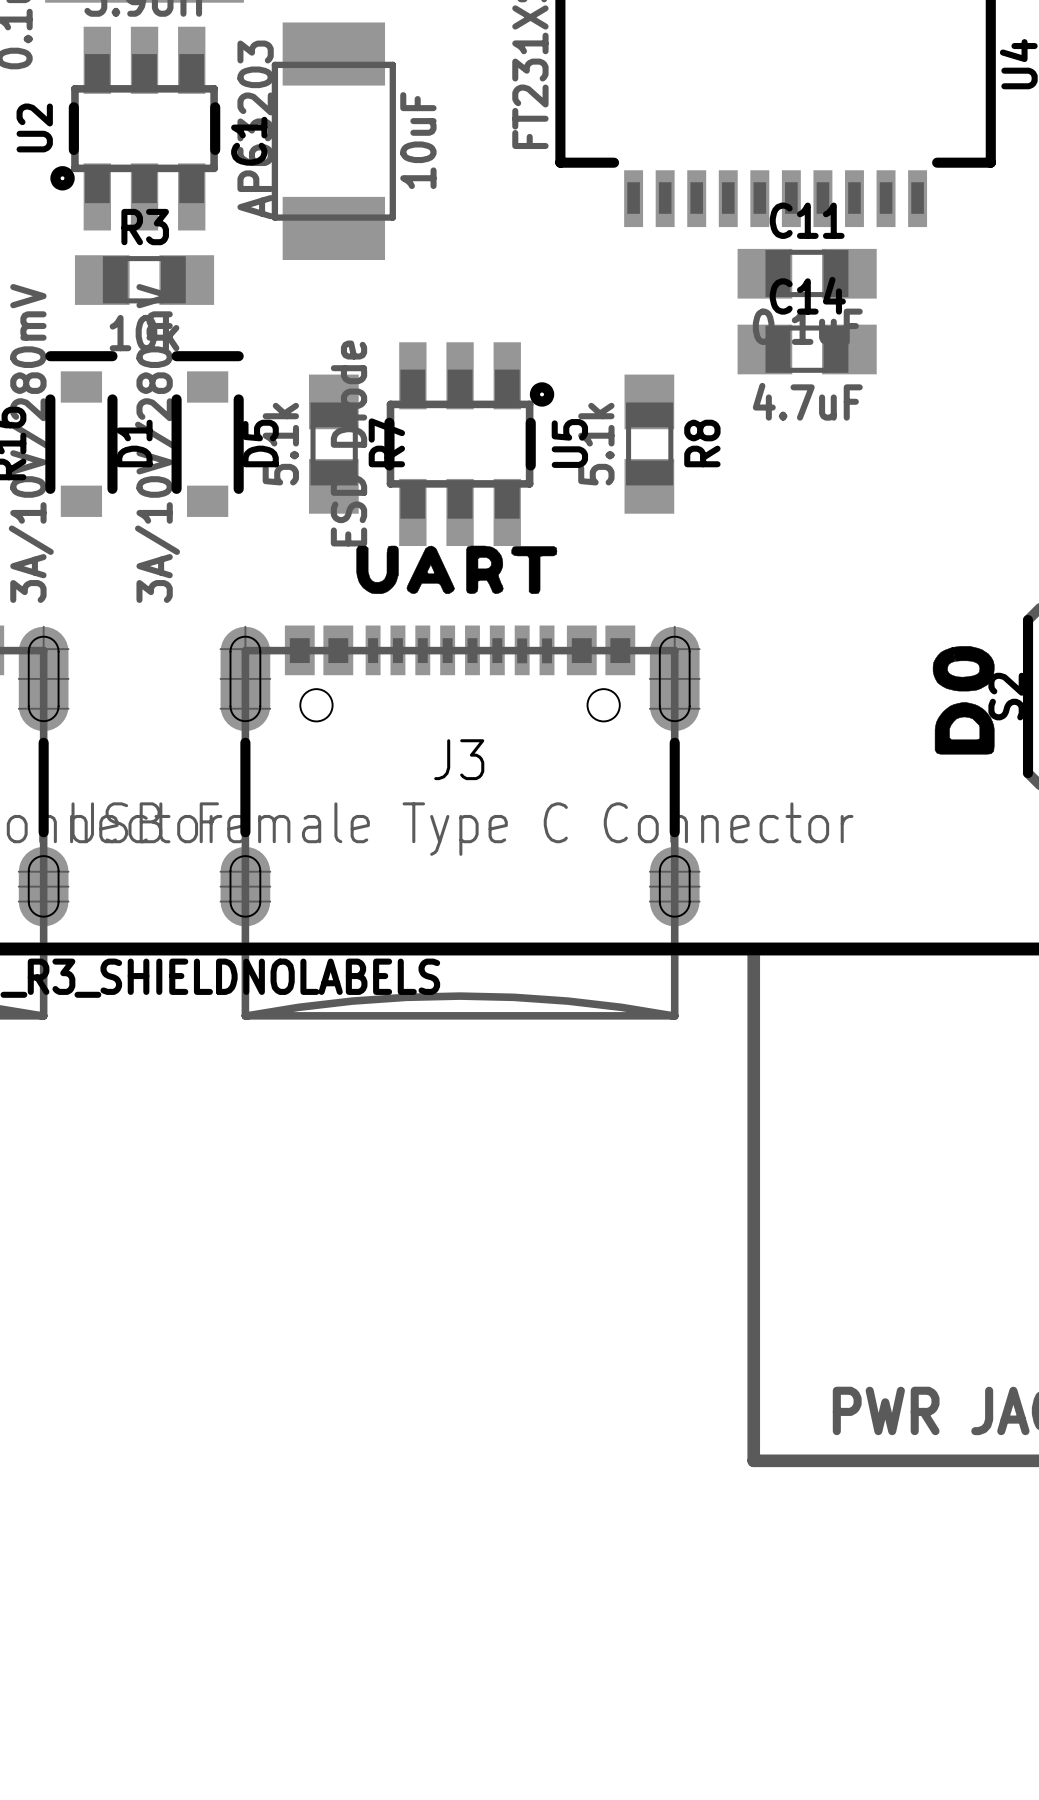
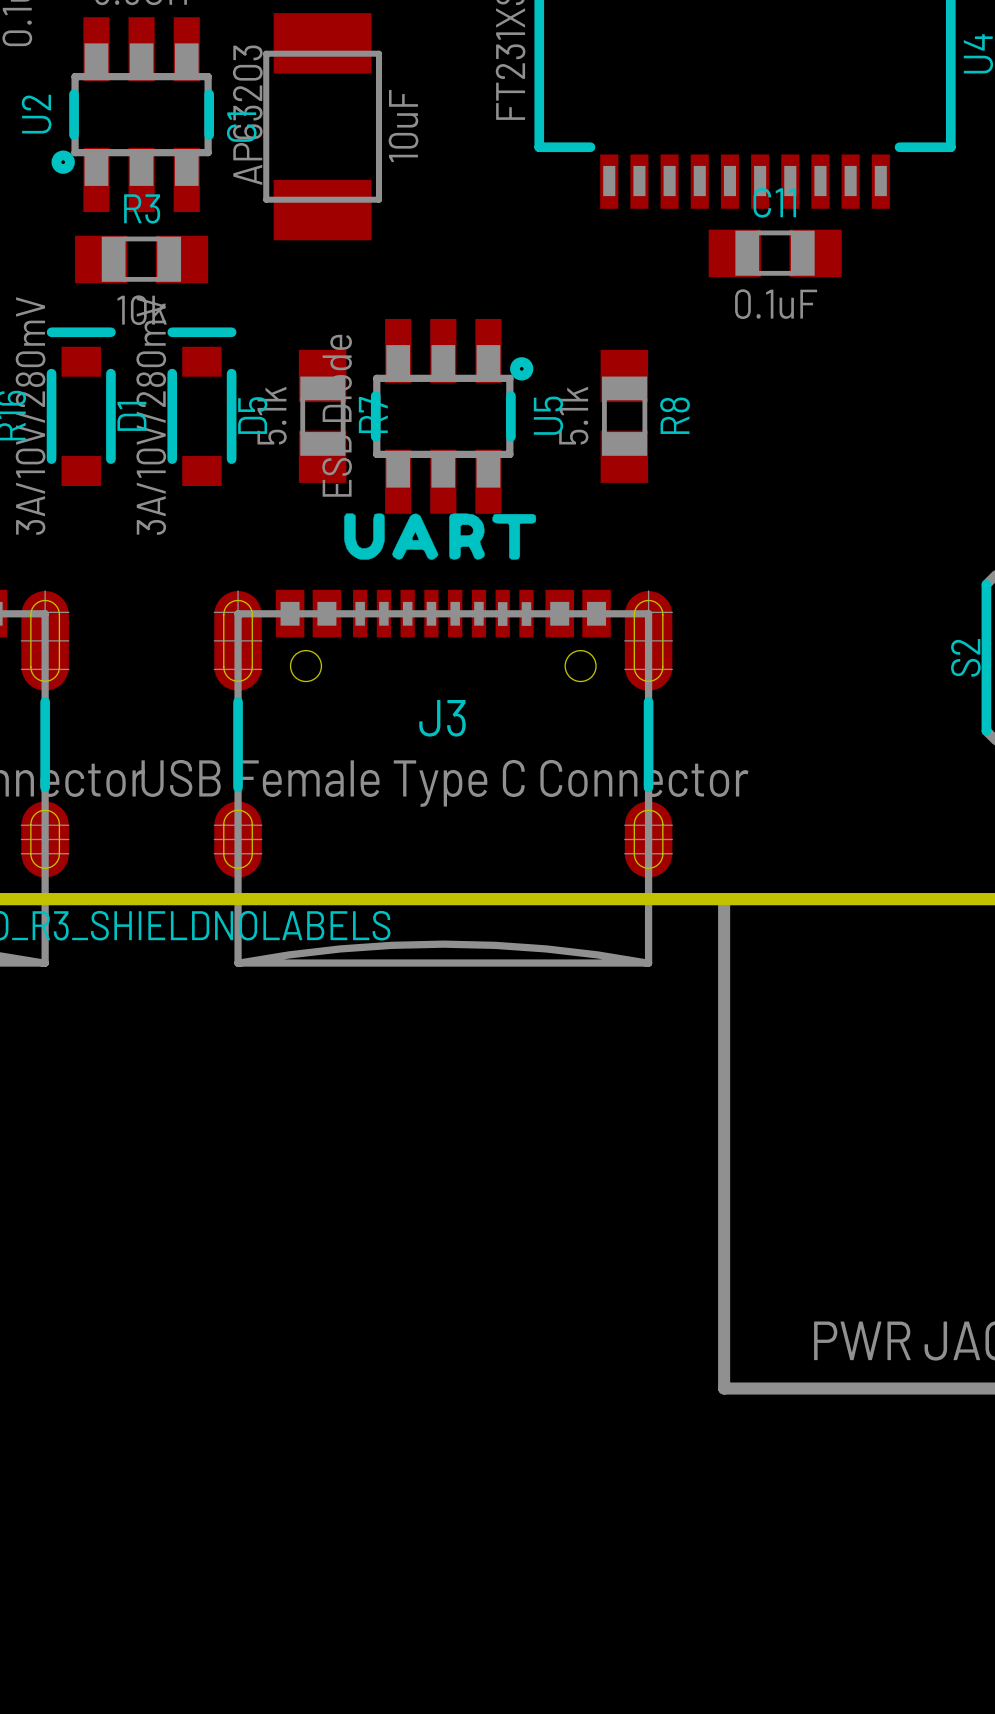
C14: 4.7uF (807, 349) -> none
drawing: [932, 646, 995, 755] -> none

